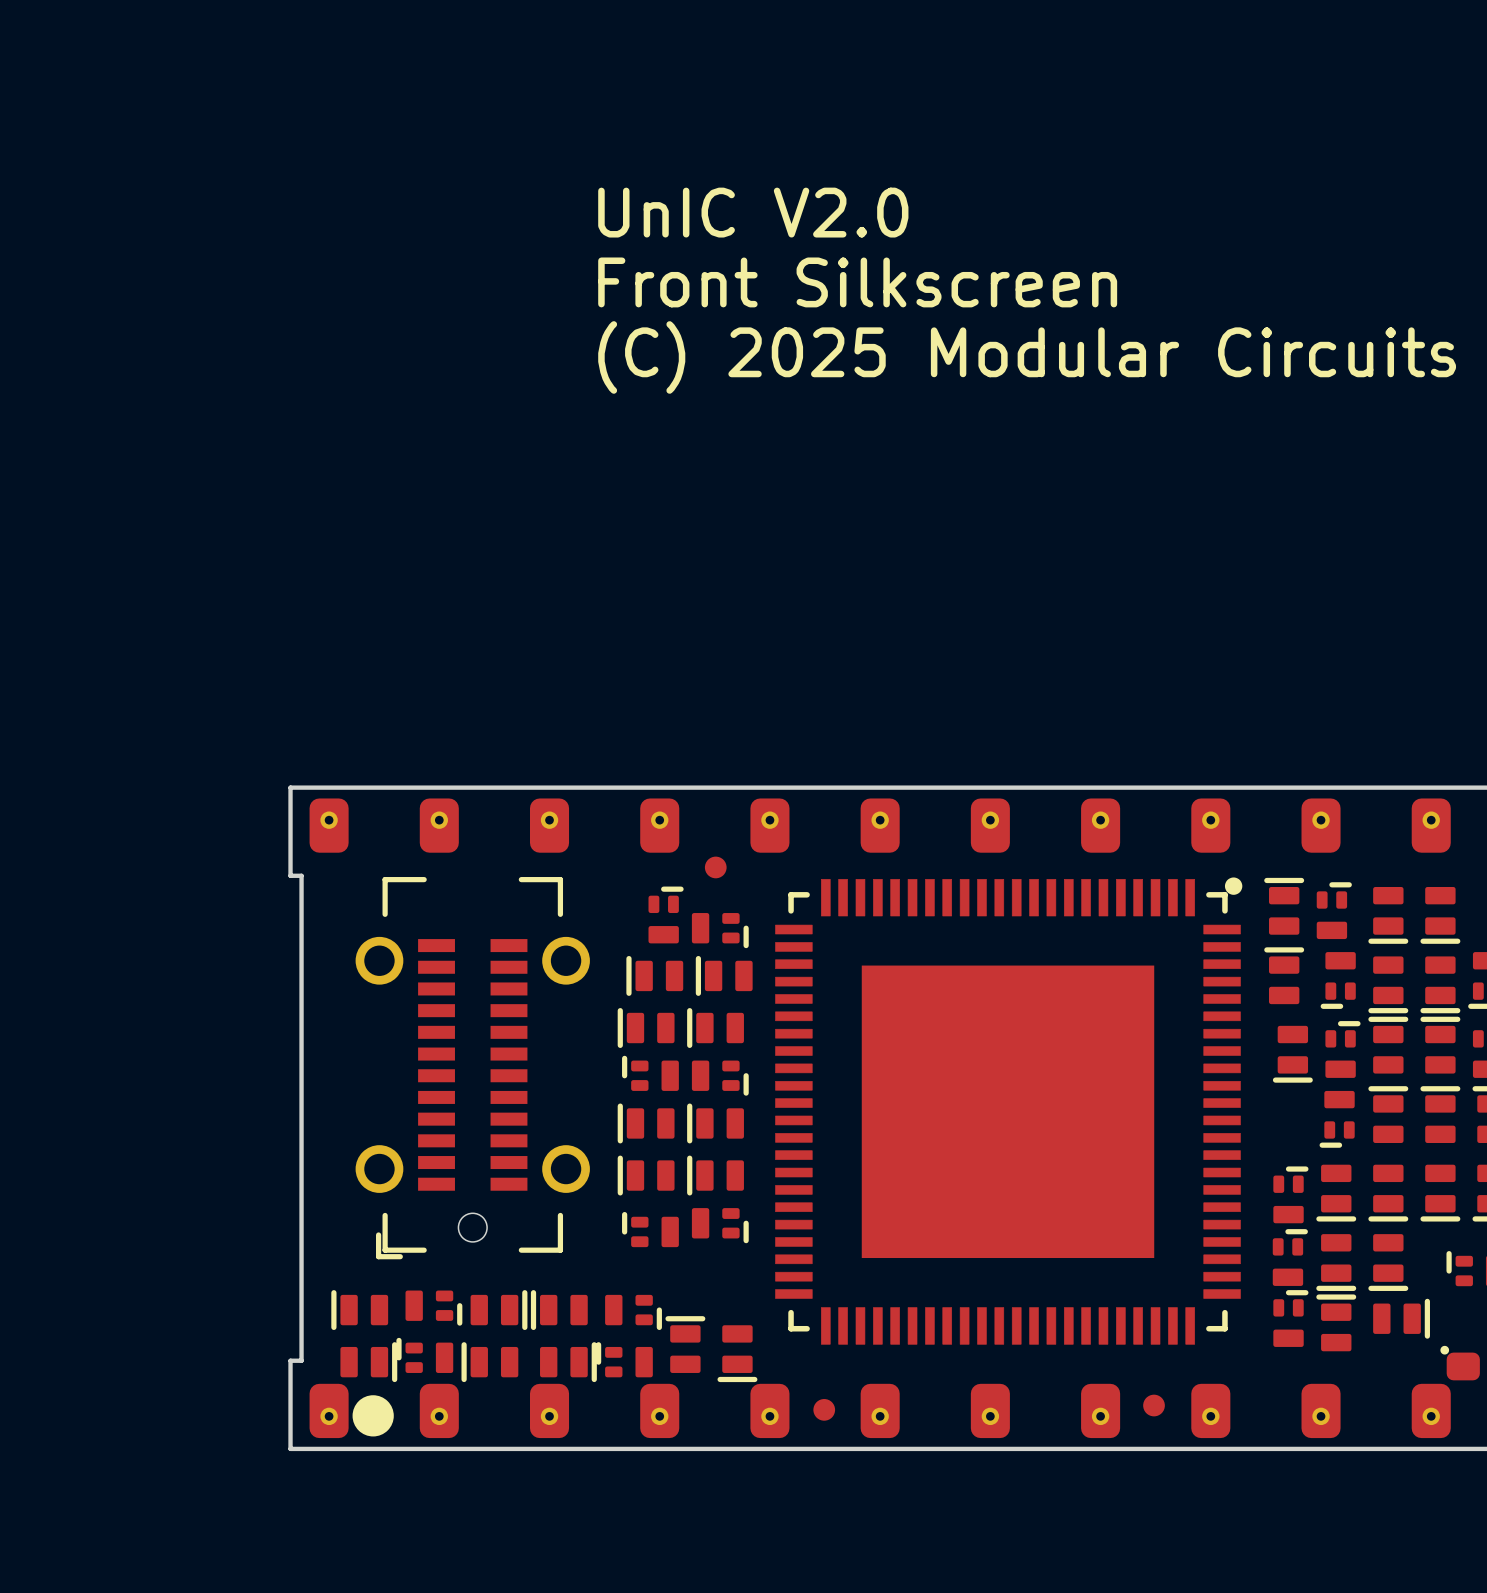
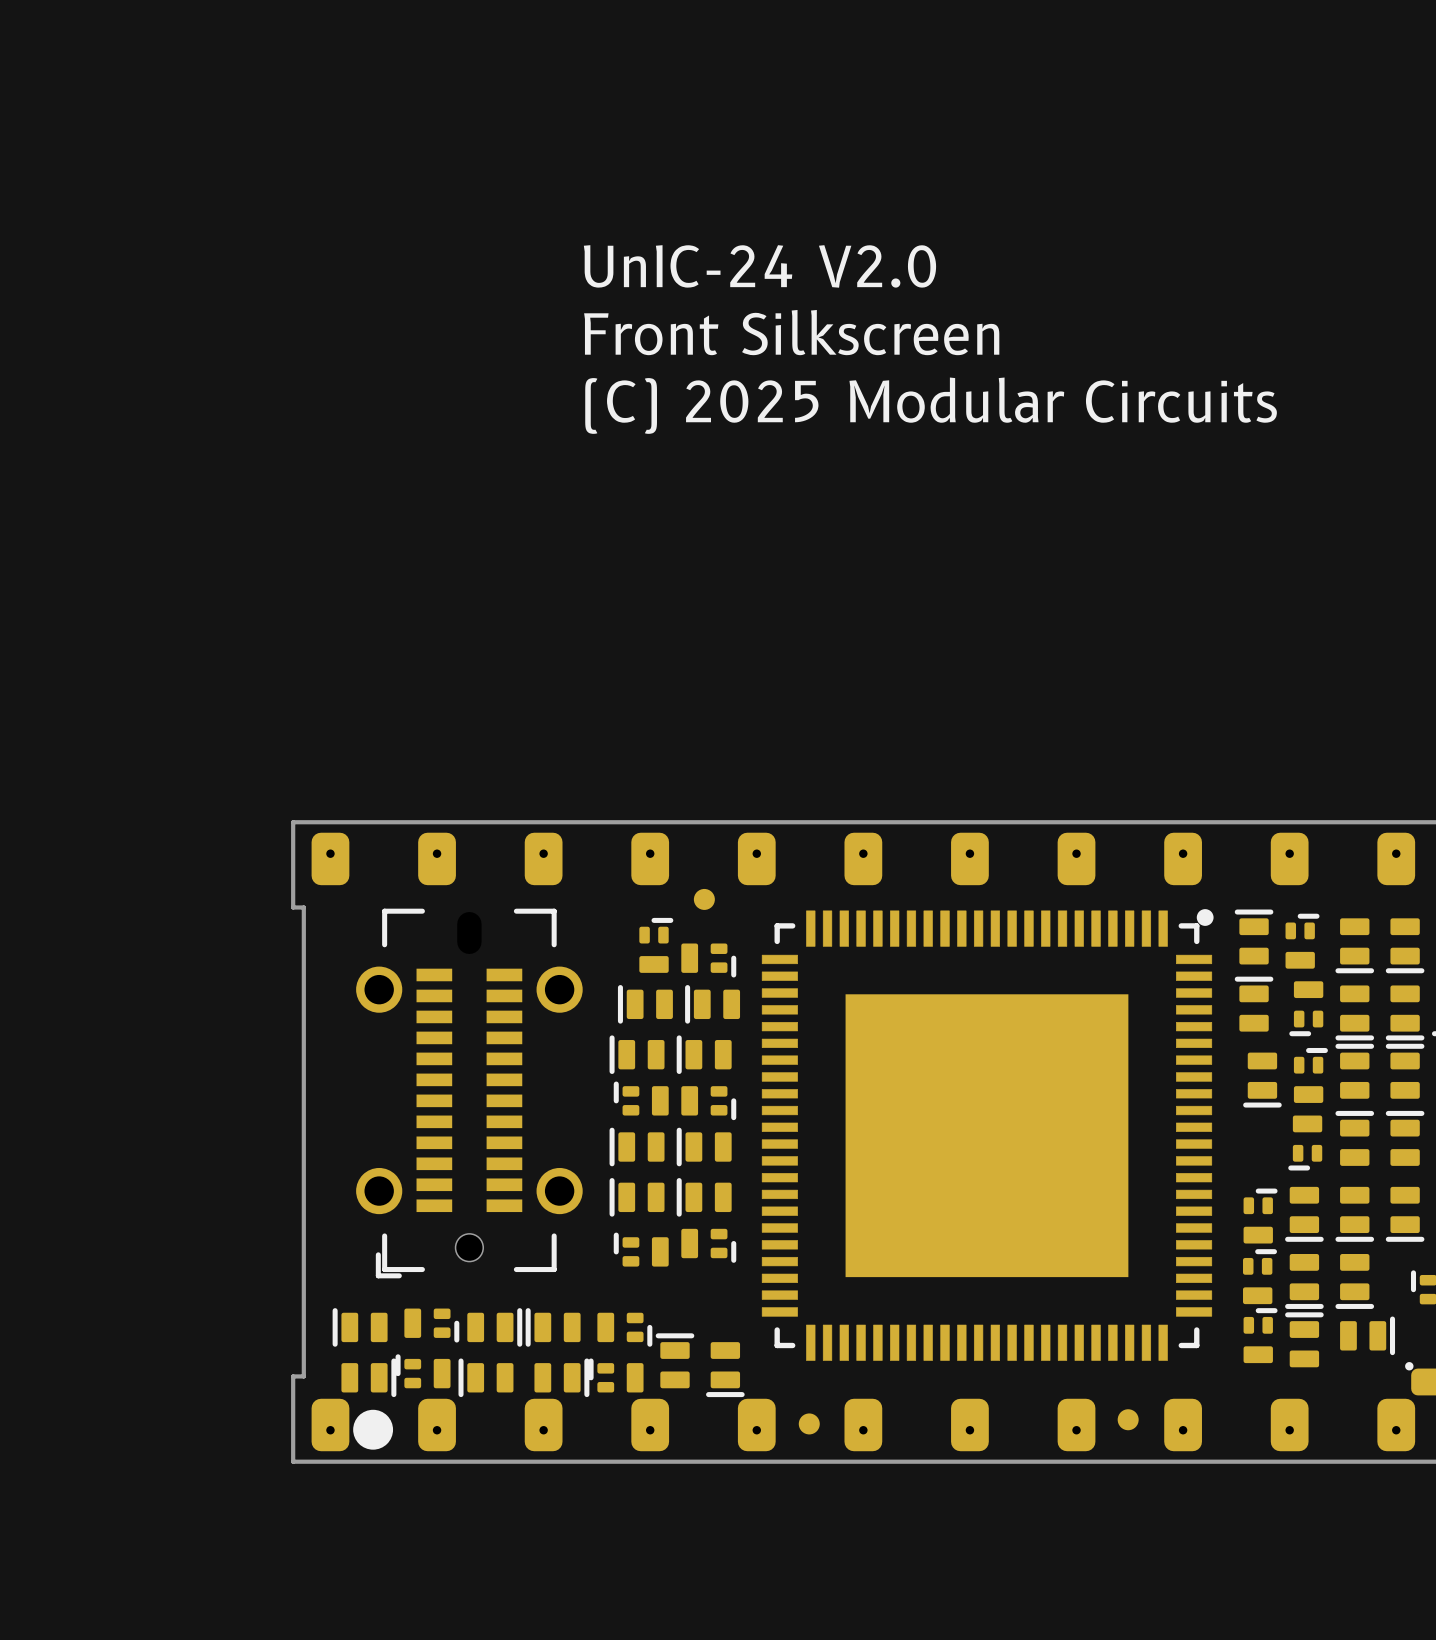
text: UnIC V2.0 (753, 212) -> UnIC-24 V2.0 (759, 266)

